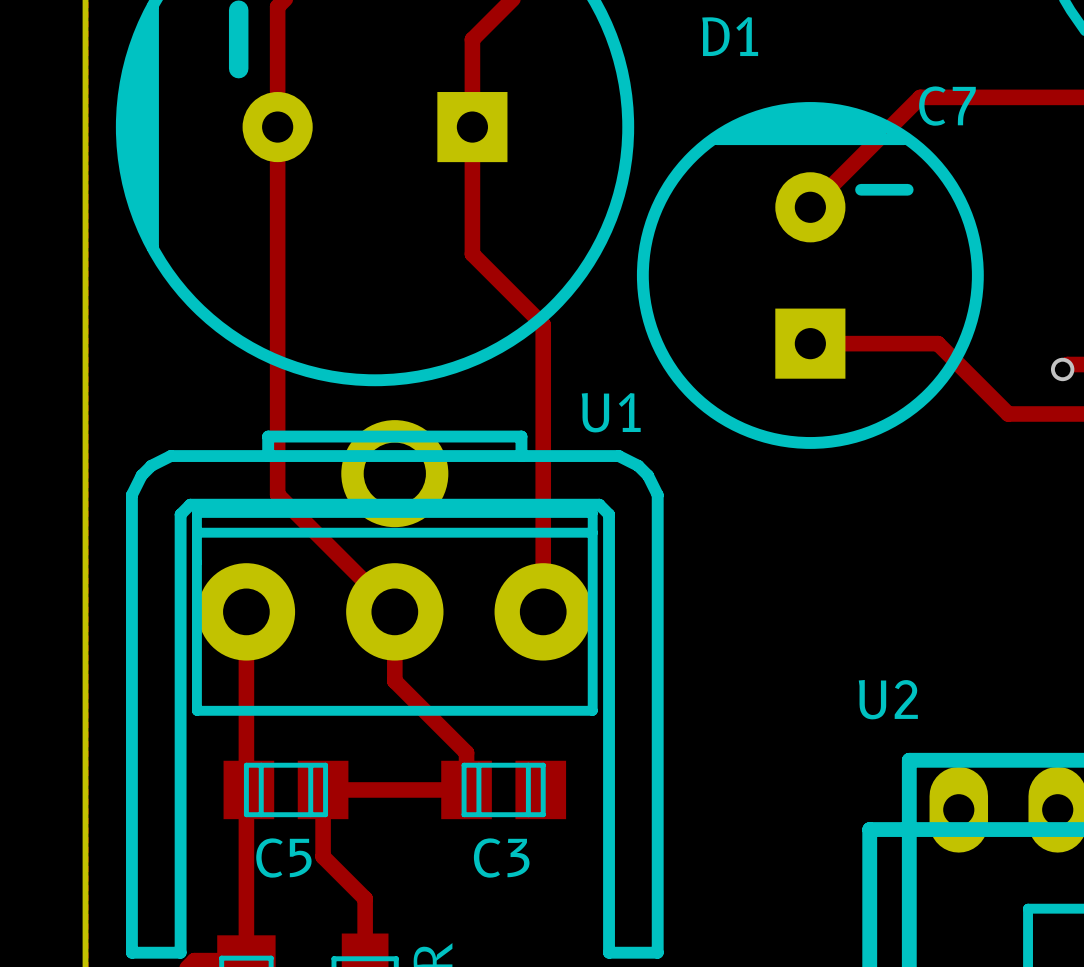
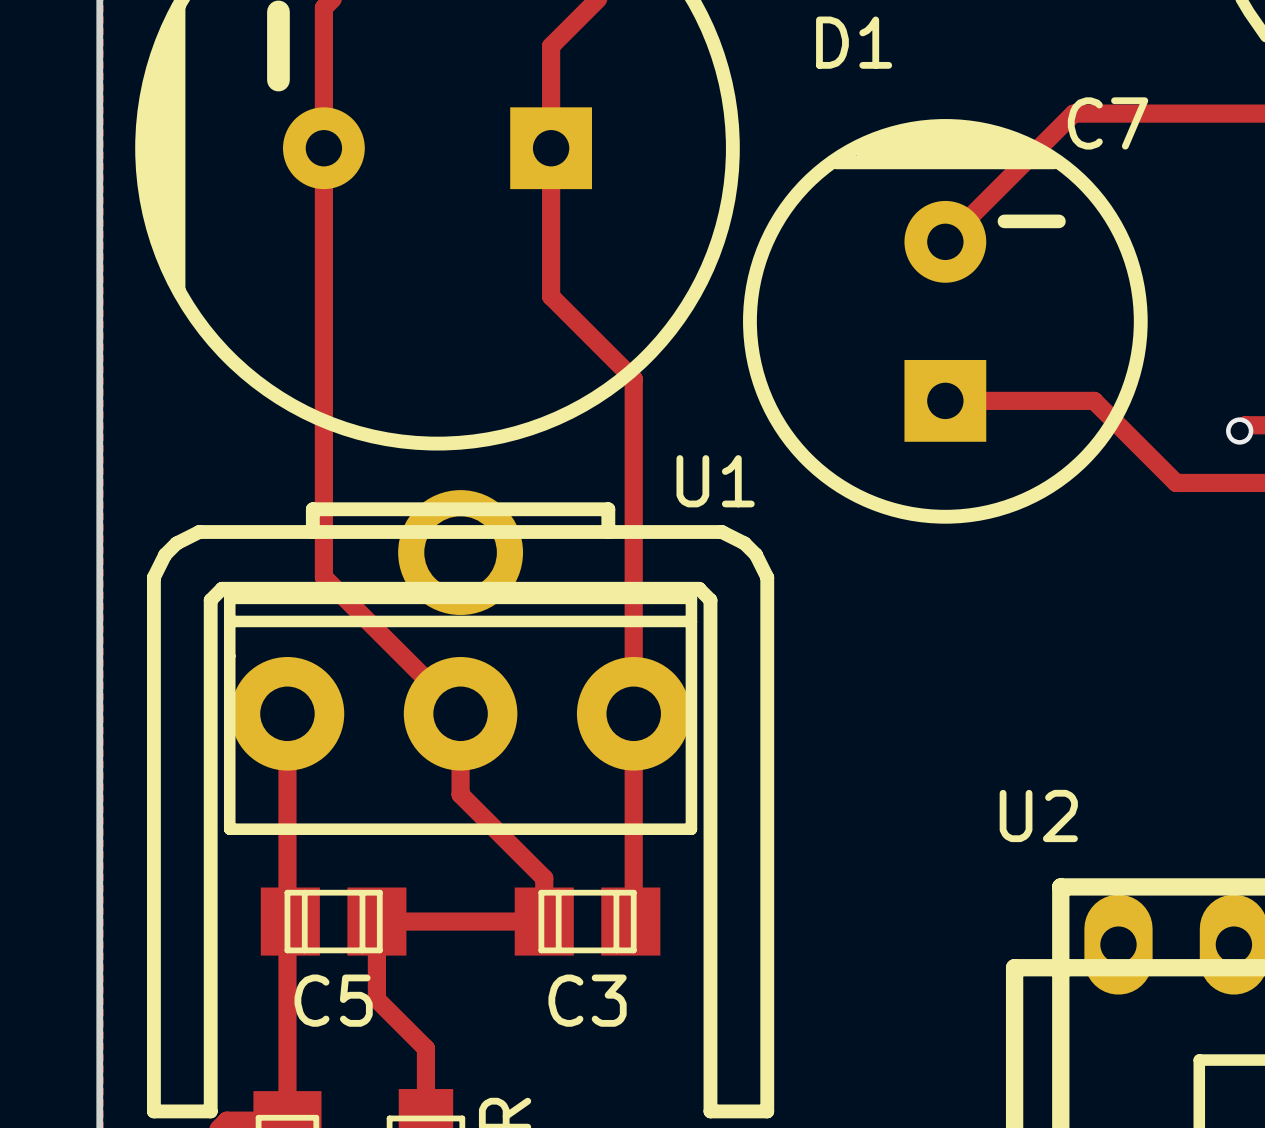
track: none -> (633, 713) (633, 918) (630, 921)

